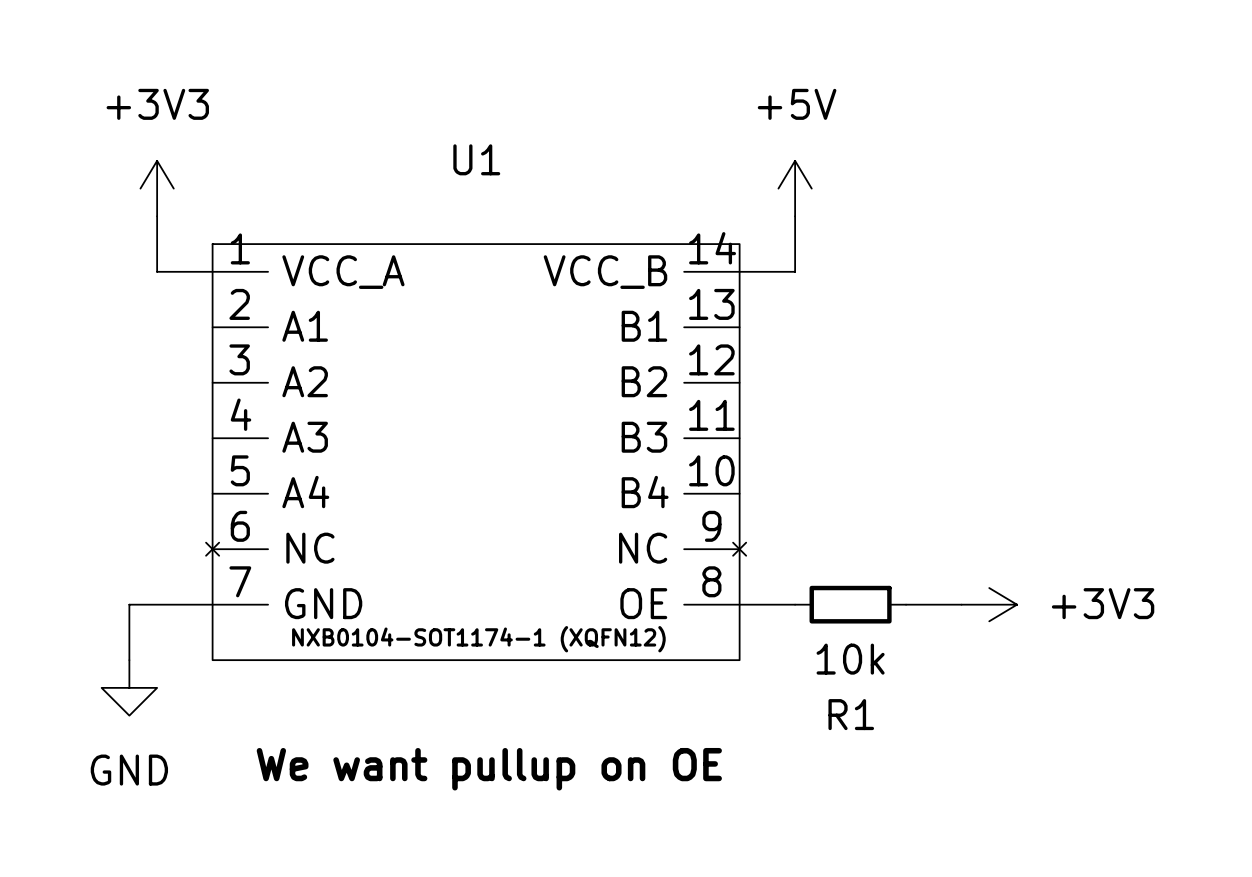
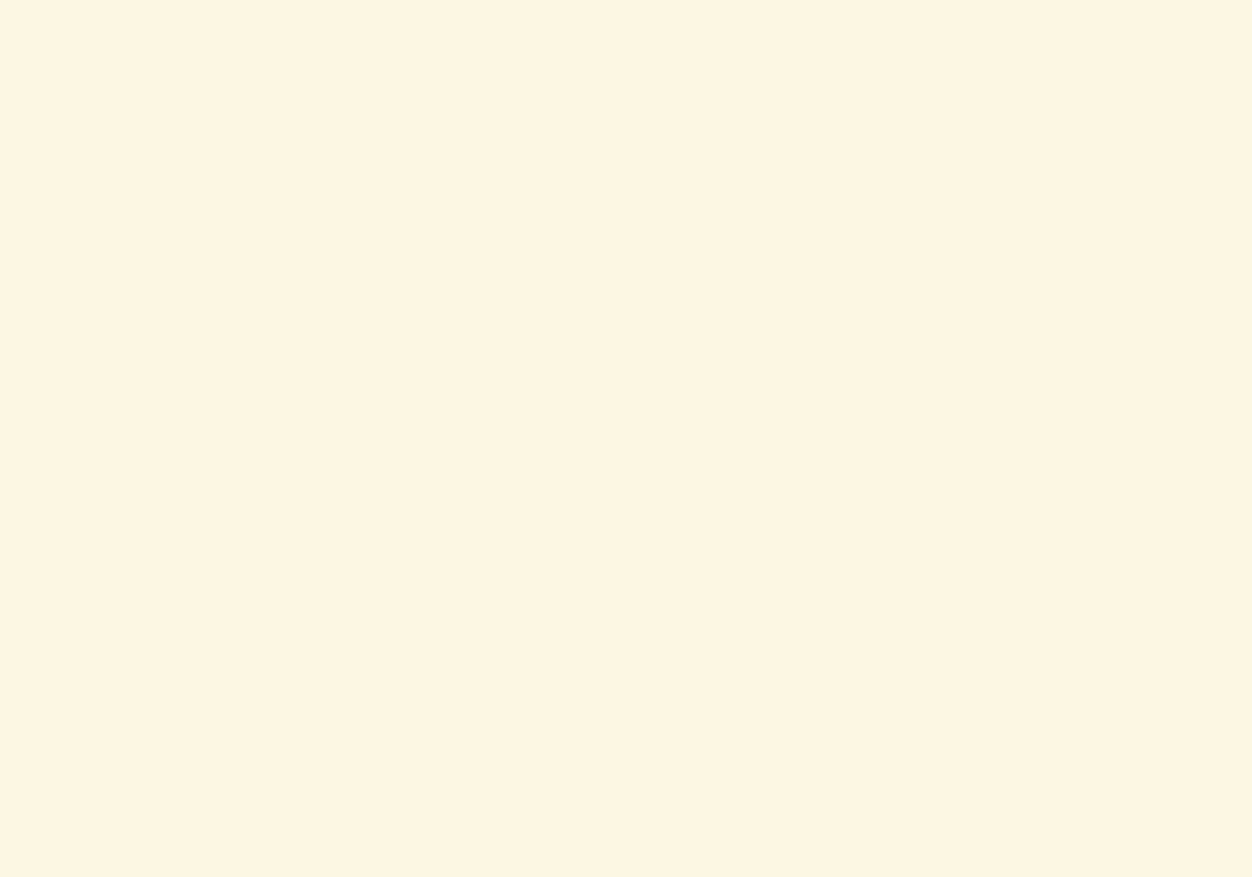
power symbol: +3V3 (157, 188) -> none
power symbol: +5V (795, 188) -> none
wire: (157, 216) (157, 271) (212, 271) -> none
wire: (795, 216) (795, 271) (739, 271) -> none
U1: (476, 452) -> none
wire: (212, 604) (129, 604) (129, 660) -> none
wire: (739, 604) (795, 604) -> none
R1: 10k (850, 604) -> none
wire: (906, 604) (961, 604) -> none
power symbol: +3V3 (989, 604) -> none
power symbol: GND (129, 687) -> none
text: We want pullup on OE (489, 769) -> none

